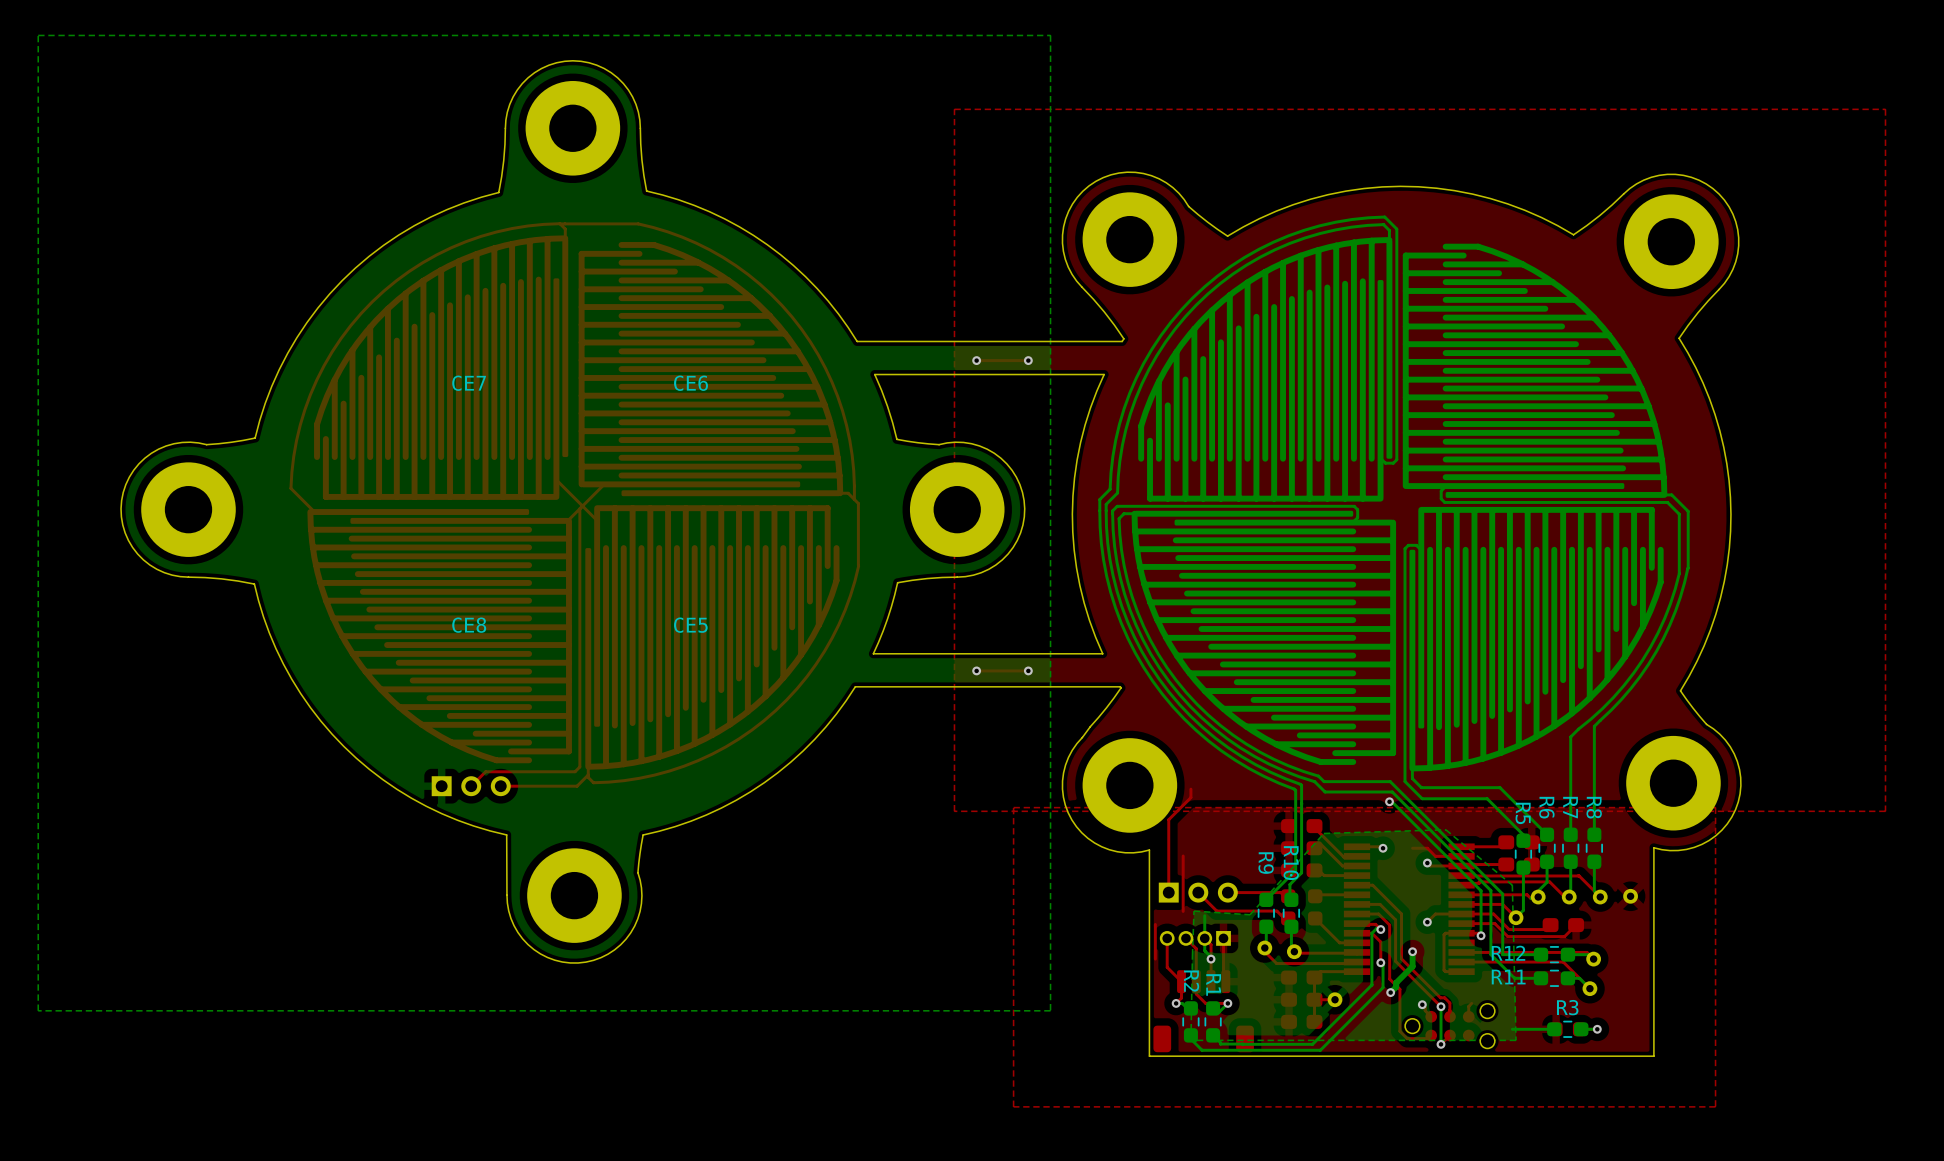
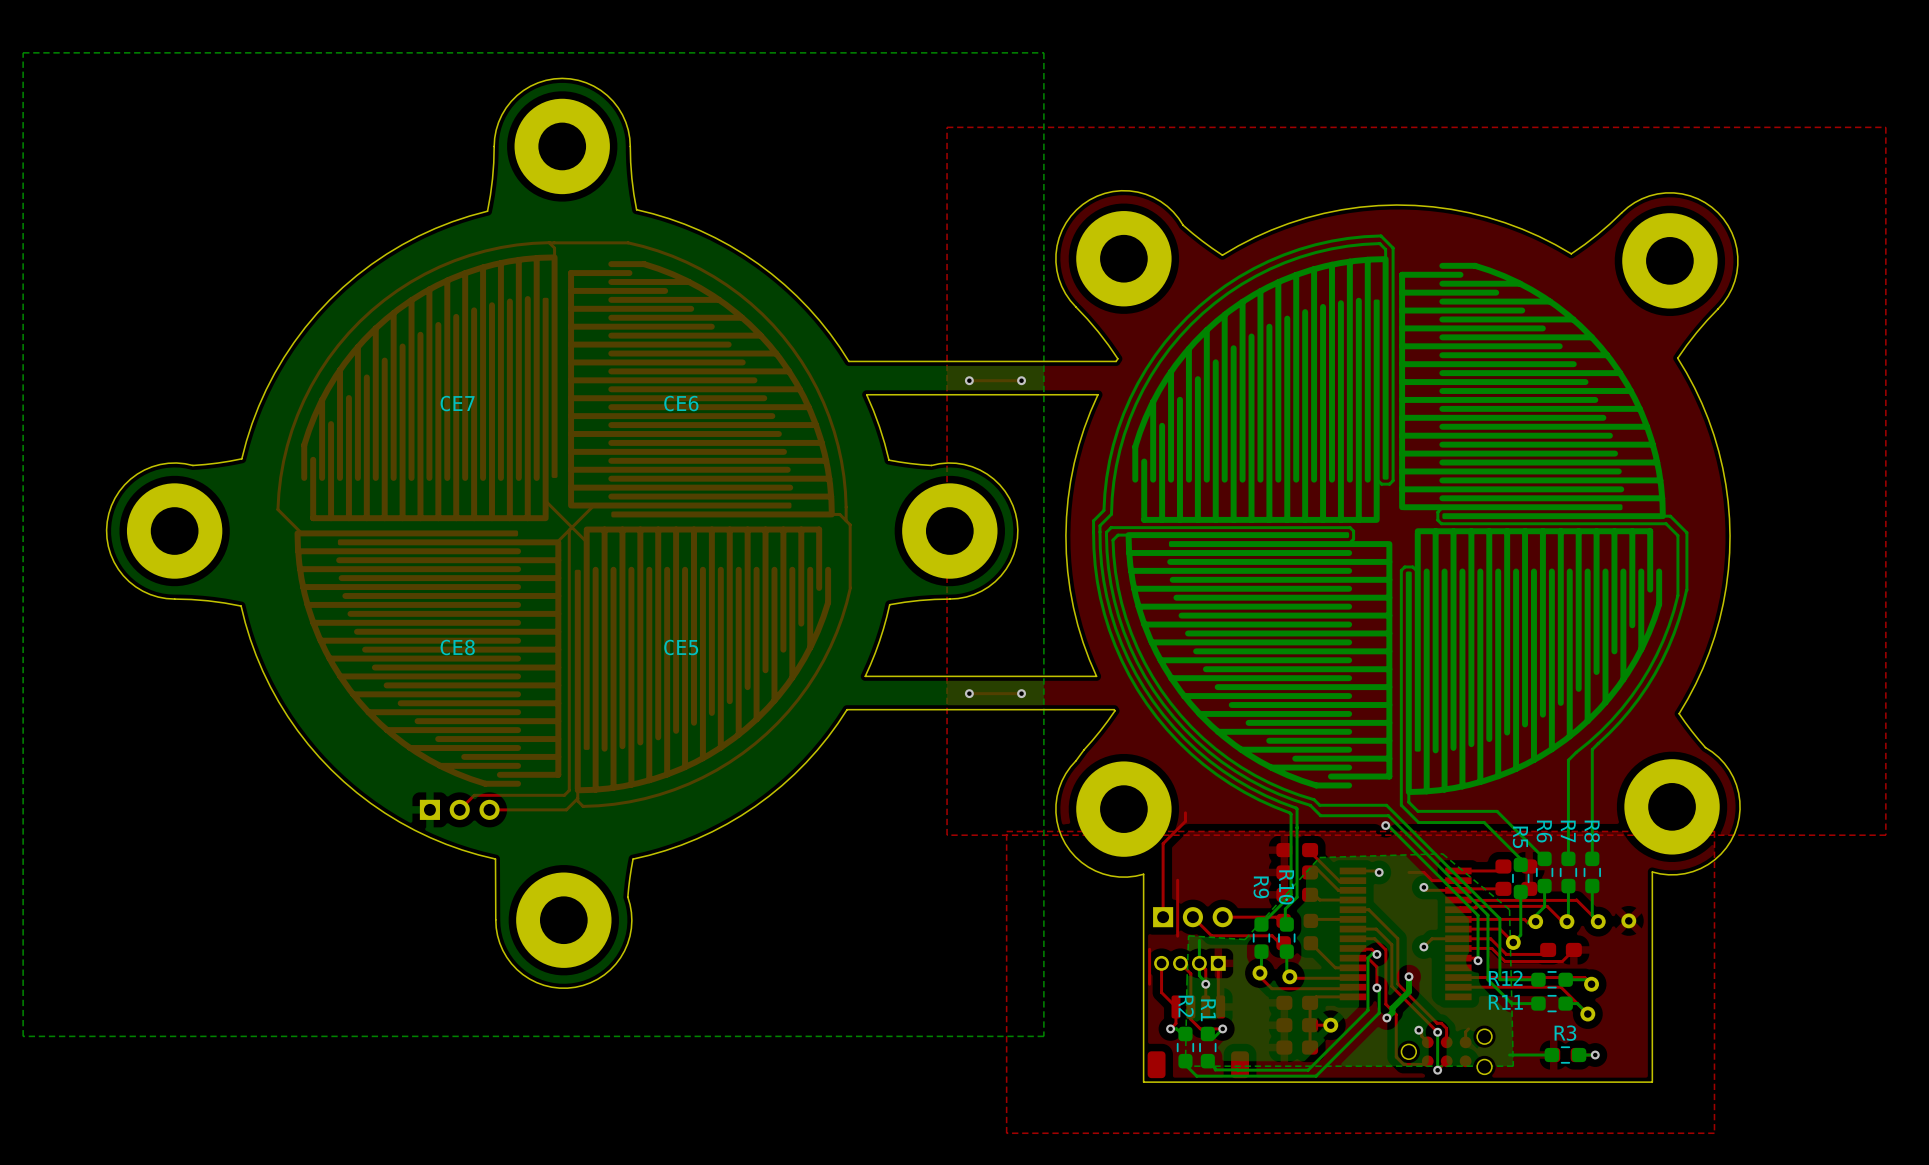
top track: (1461, 933) (1444, 934) (1444, 970) (1461, 971) -> none

